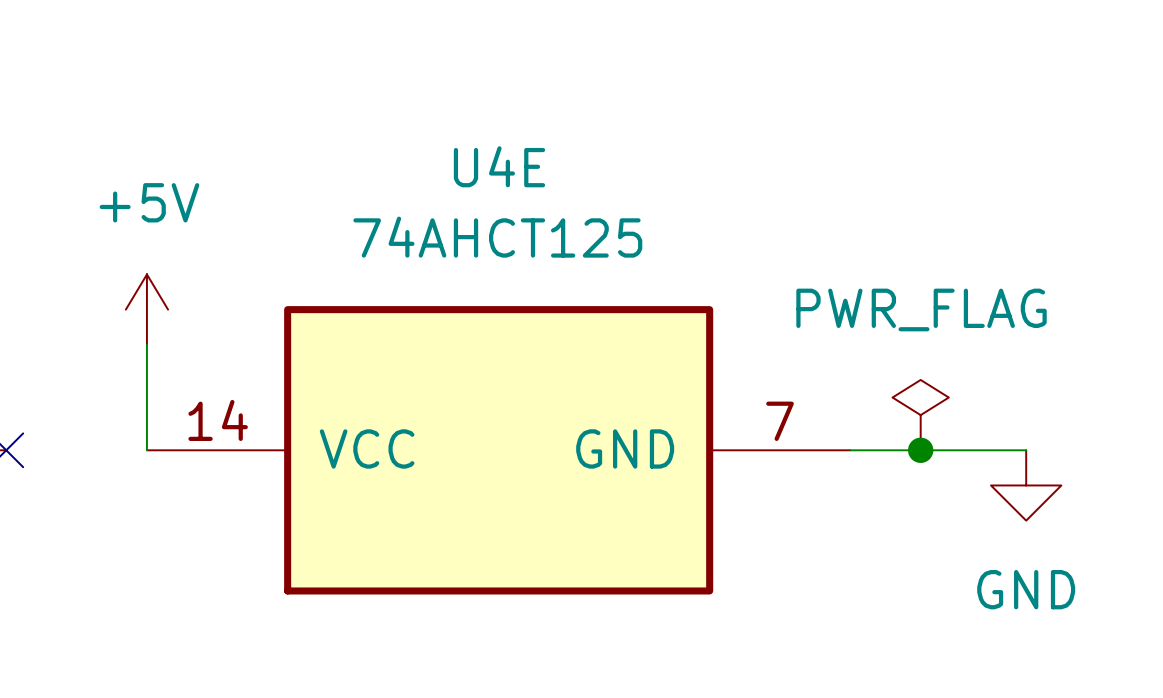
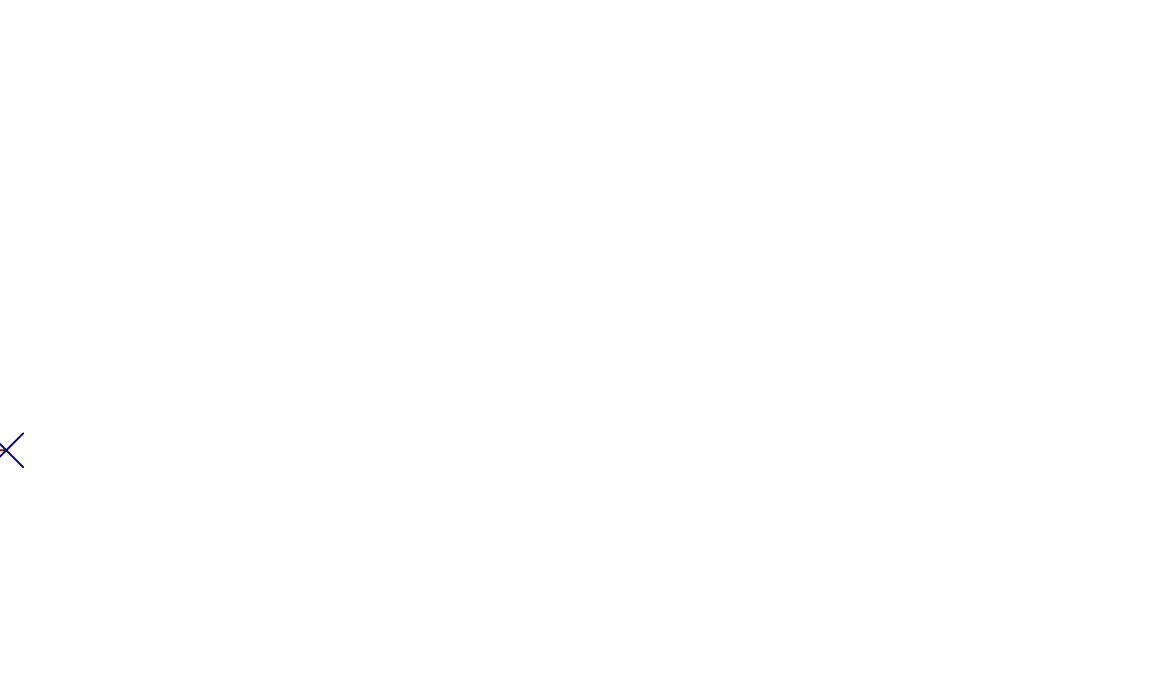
power symbol: +5V (146, 309) -> none
wire: (146, 344) (146, 450) -> none
power symbol: PWR_FLAG (920, 415) -> none
U4E: 74AHCT125 (498, 450) -> none
wire: (850, 450) (1026, 450) -> none
junction: (920, 450) -> none
power symbol: GND (1026, 485) -> none

